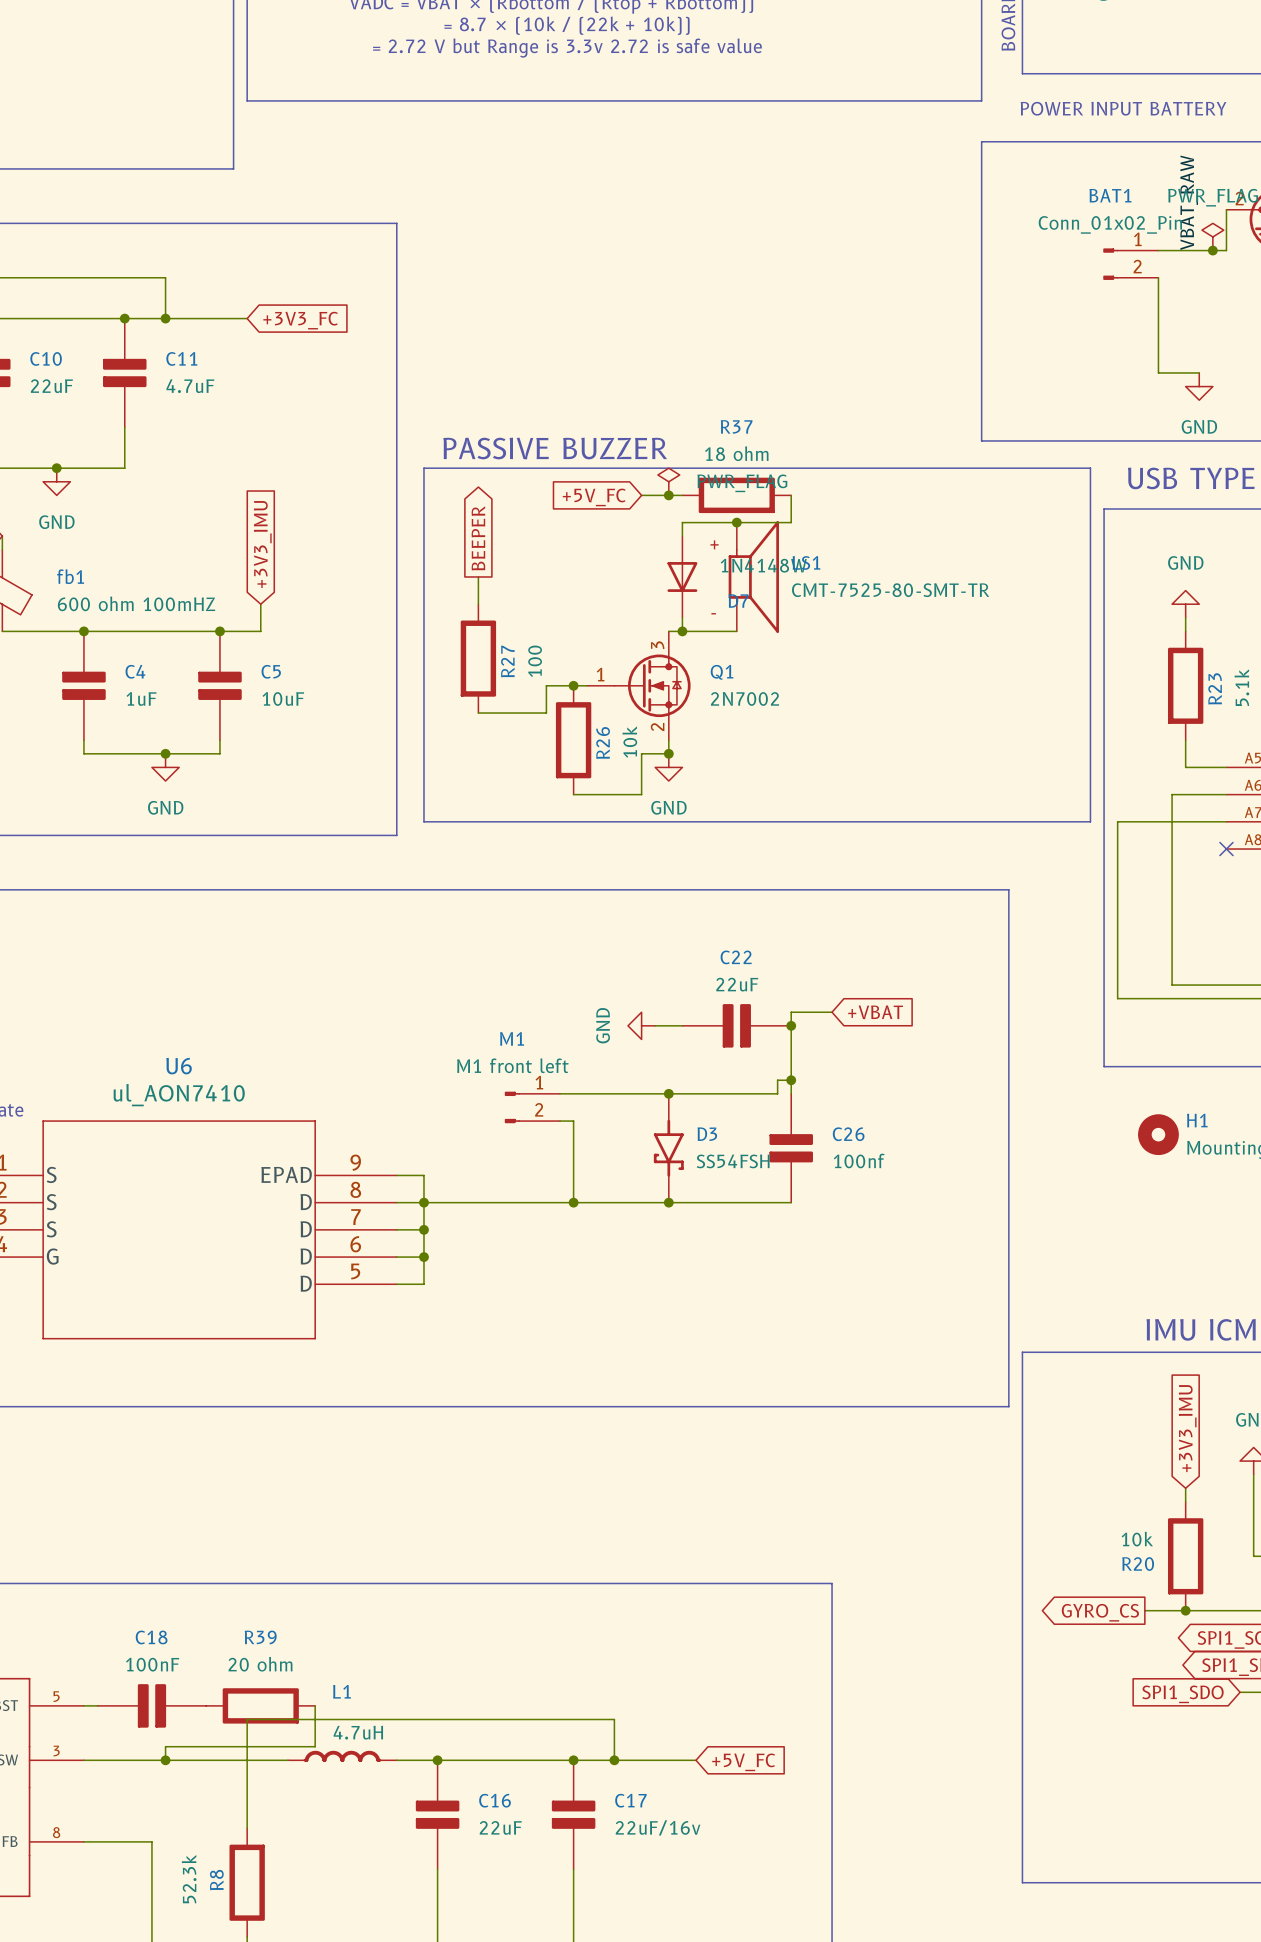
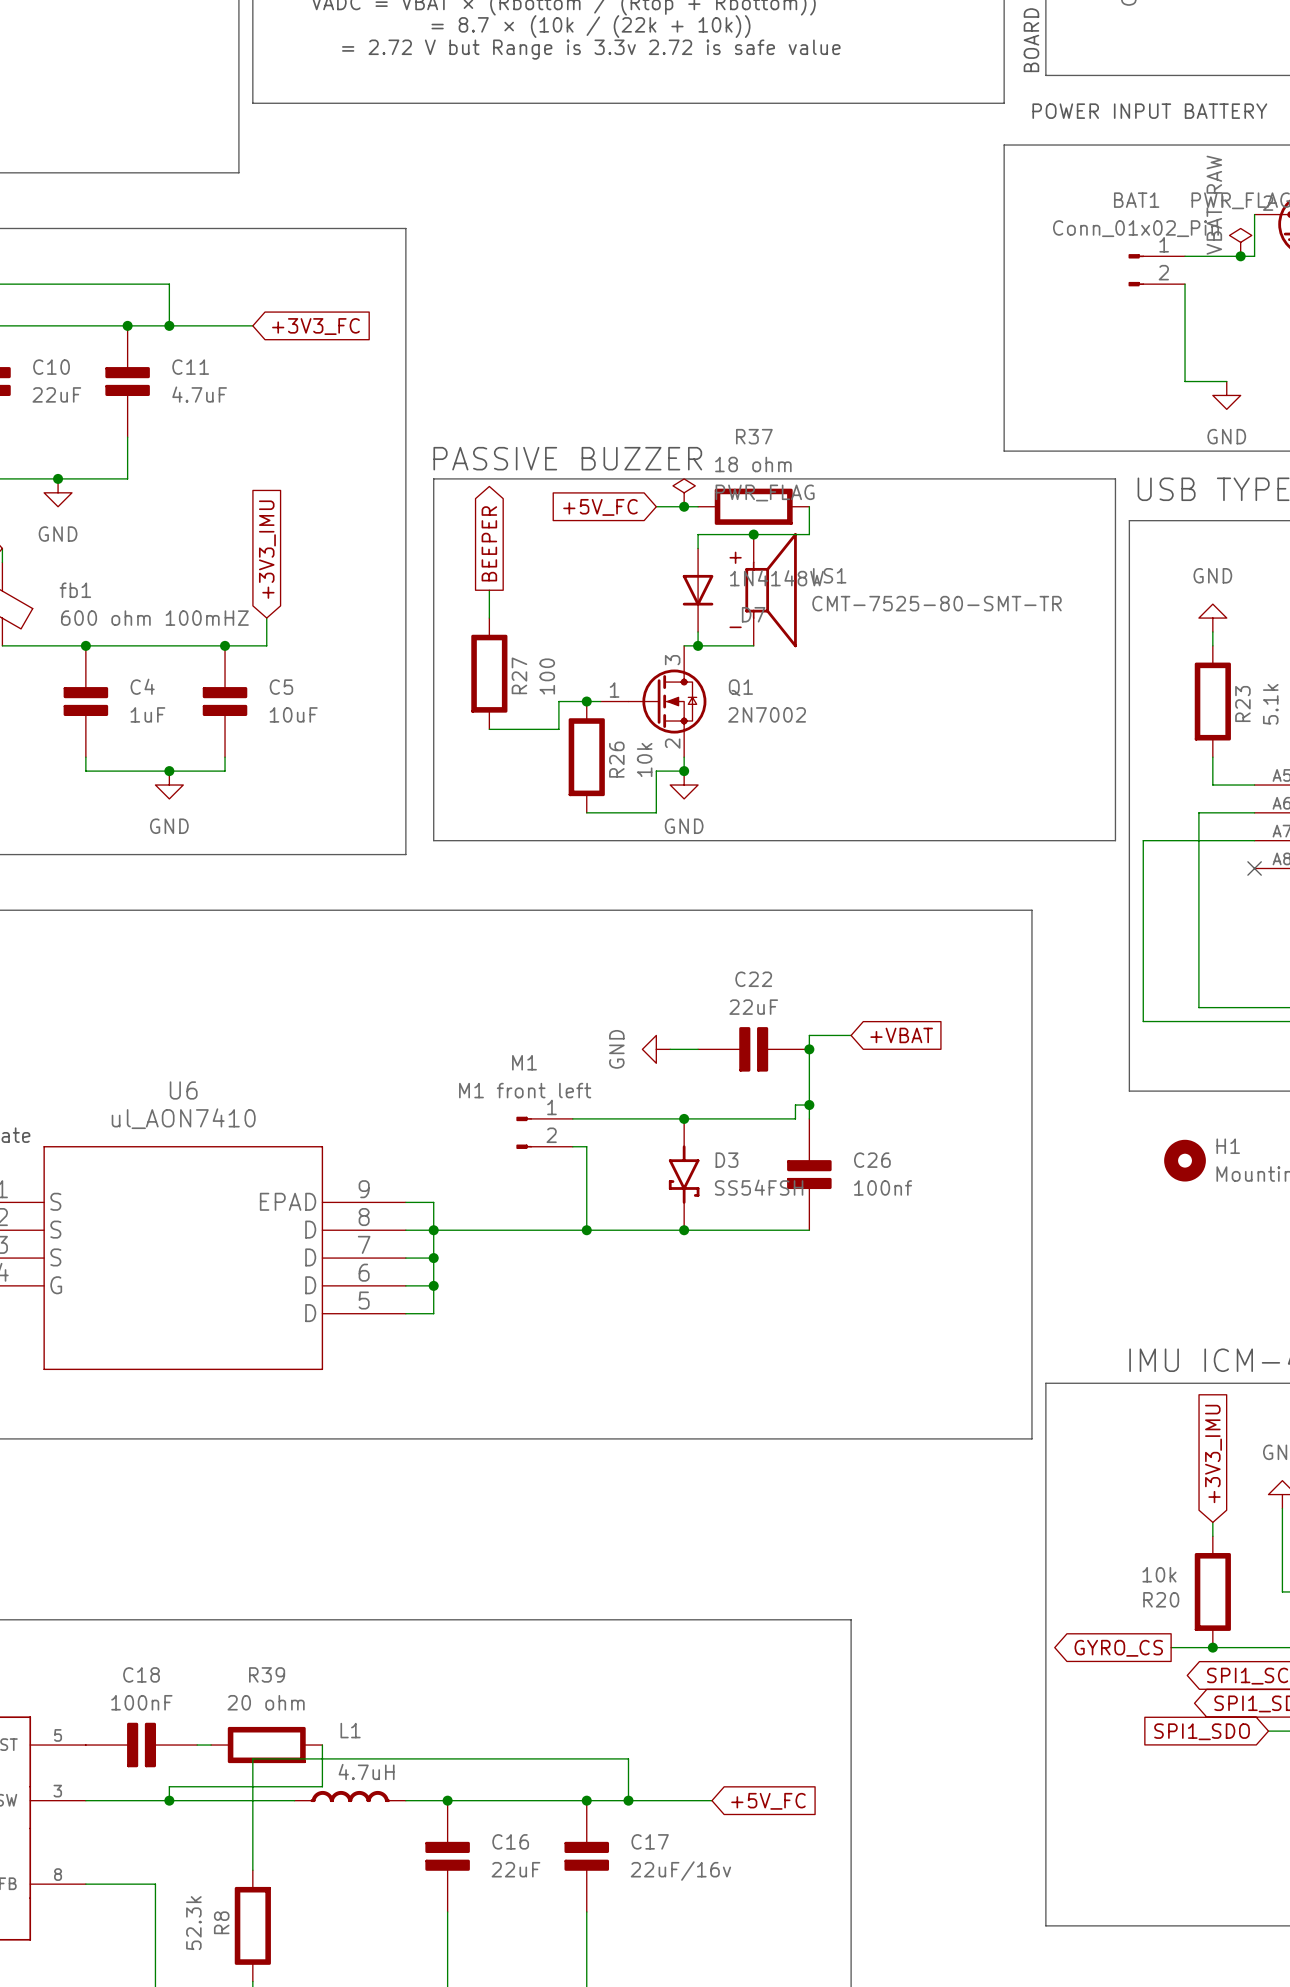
C18 position: (151, 1705) -> (141, 1745)

